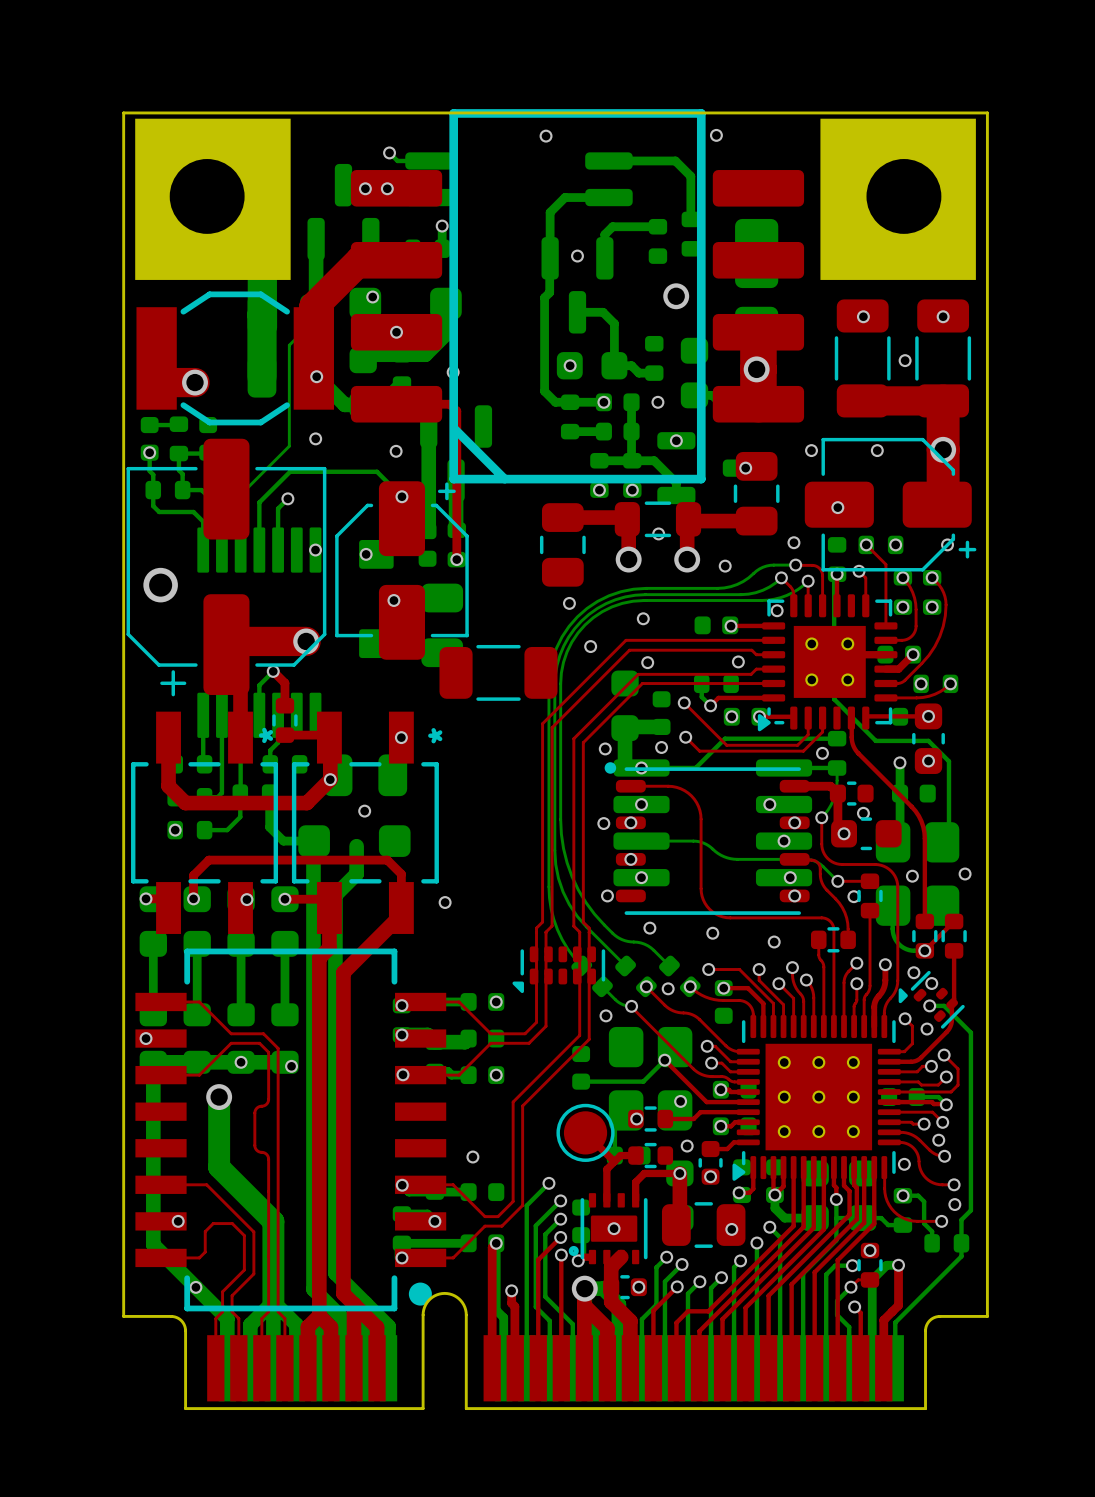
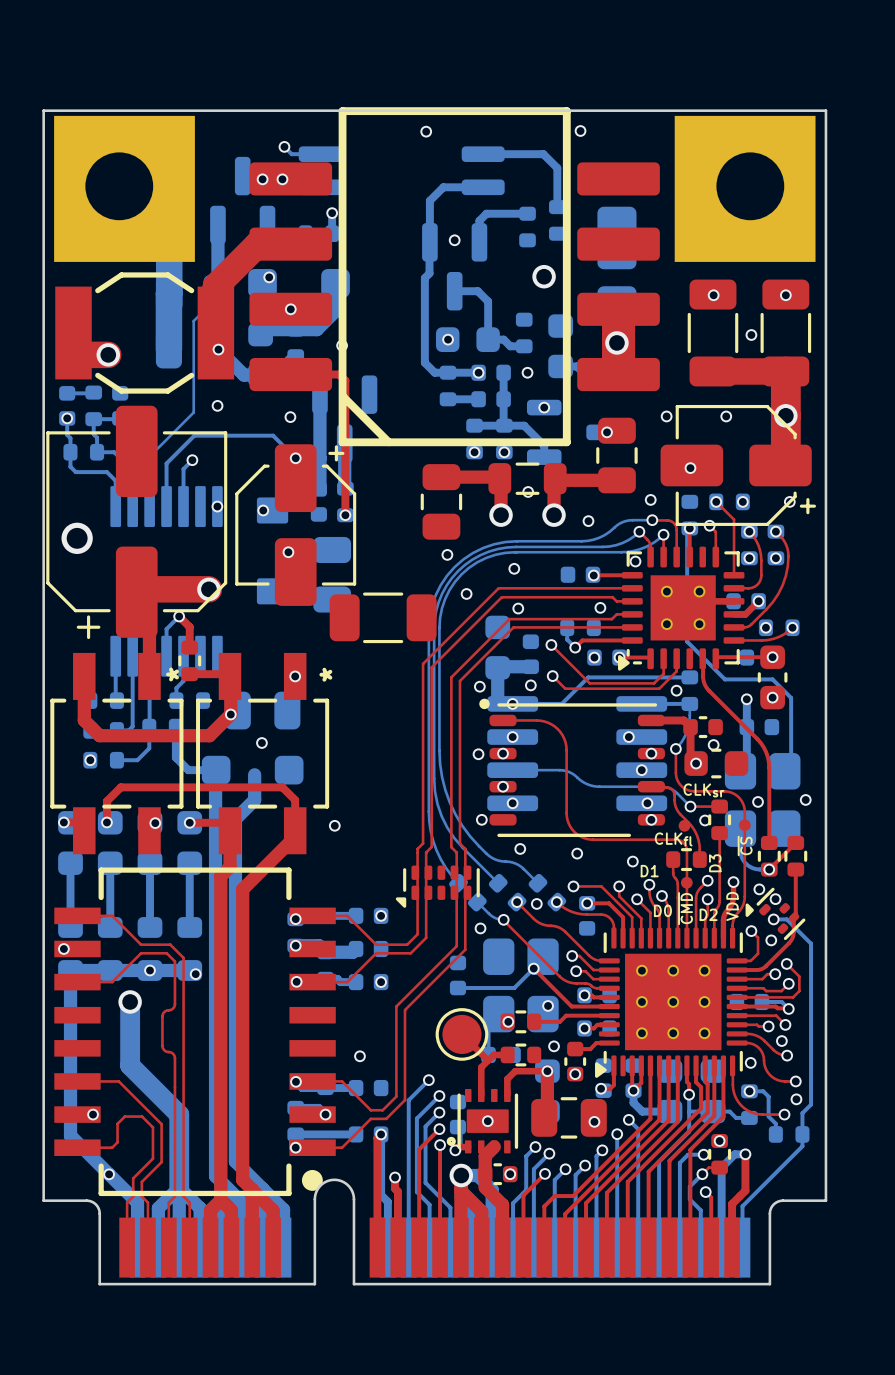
part footprint: [604, 762, 810, 915] -> [479, 698, 665, 838]
text: none -> CLKsr (703, 790)
part: none -> (744, 825)
part: none -> (684, 825)
text: none -> CLKfl (673, 839)
text: none -> ~{CS} (745, 845)
text: none -> D3 (715, 863)
text: none -> D1 (649, 871)
part: none -> (686, 882)
text: none -> VDD (732, 906)
text: none -> ~{CMD} (685, 908)
text: none -> D0 (662, 910)
text: none -> D2 (708, 914)

